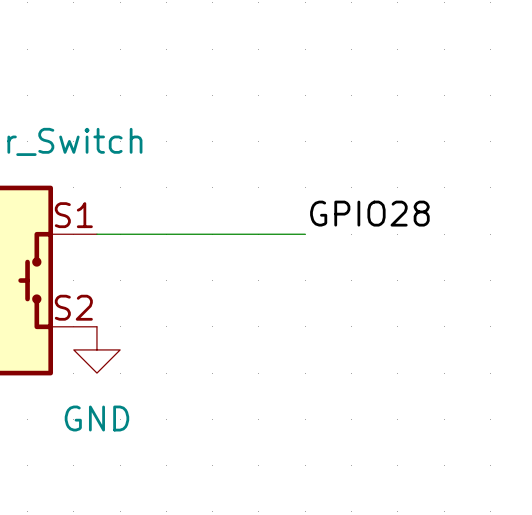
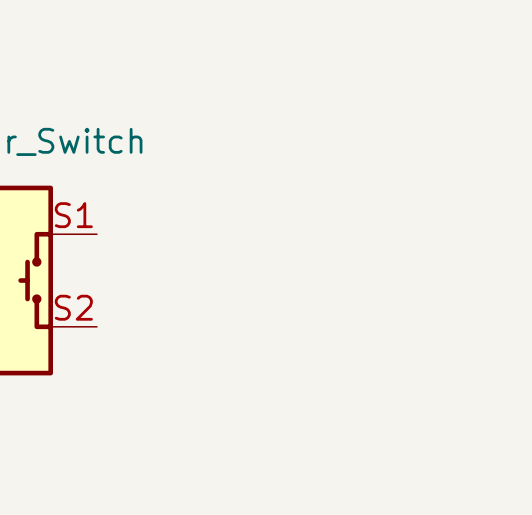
label: GPIO28 (369, 213) -> none
wire: (96, 234) (305, 234) -> none
power symbol: GND (96, 349) -> none

